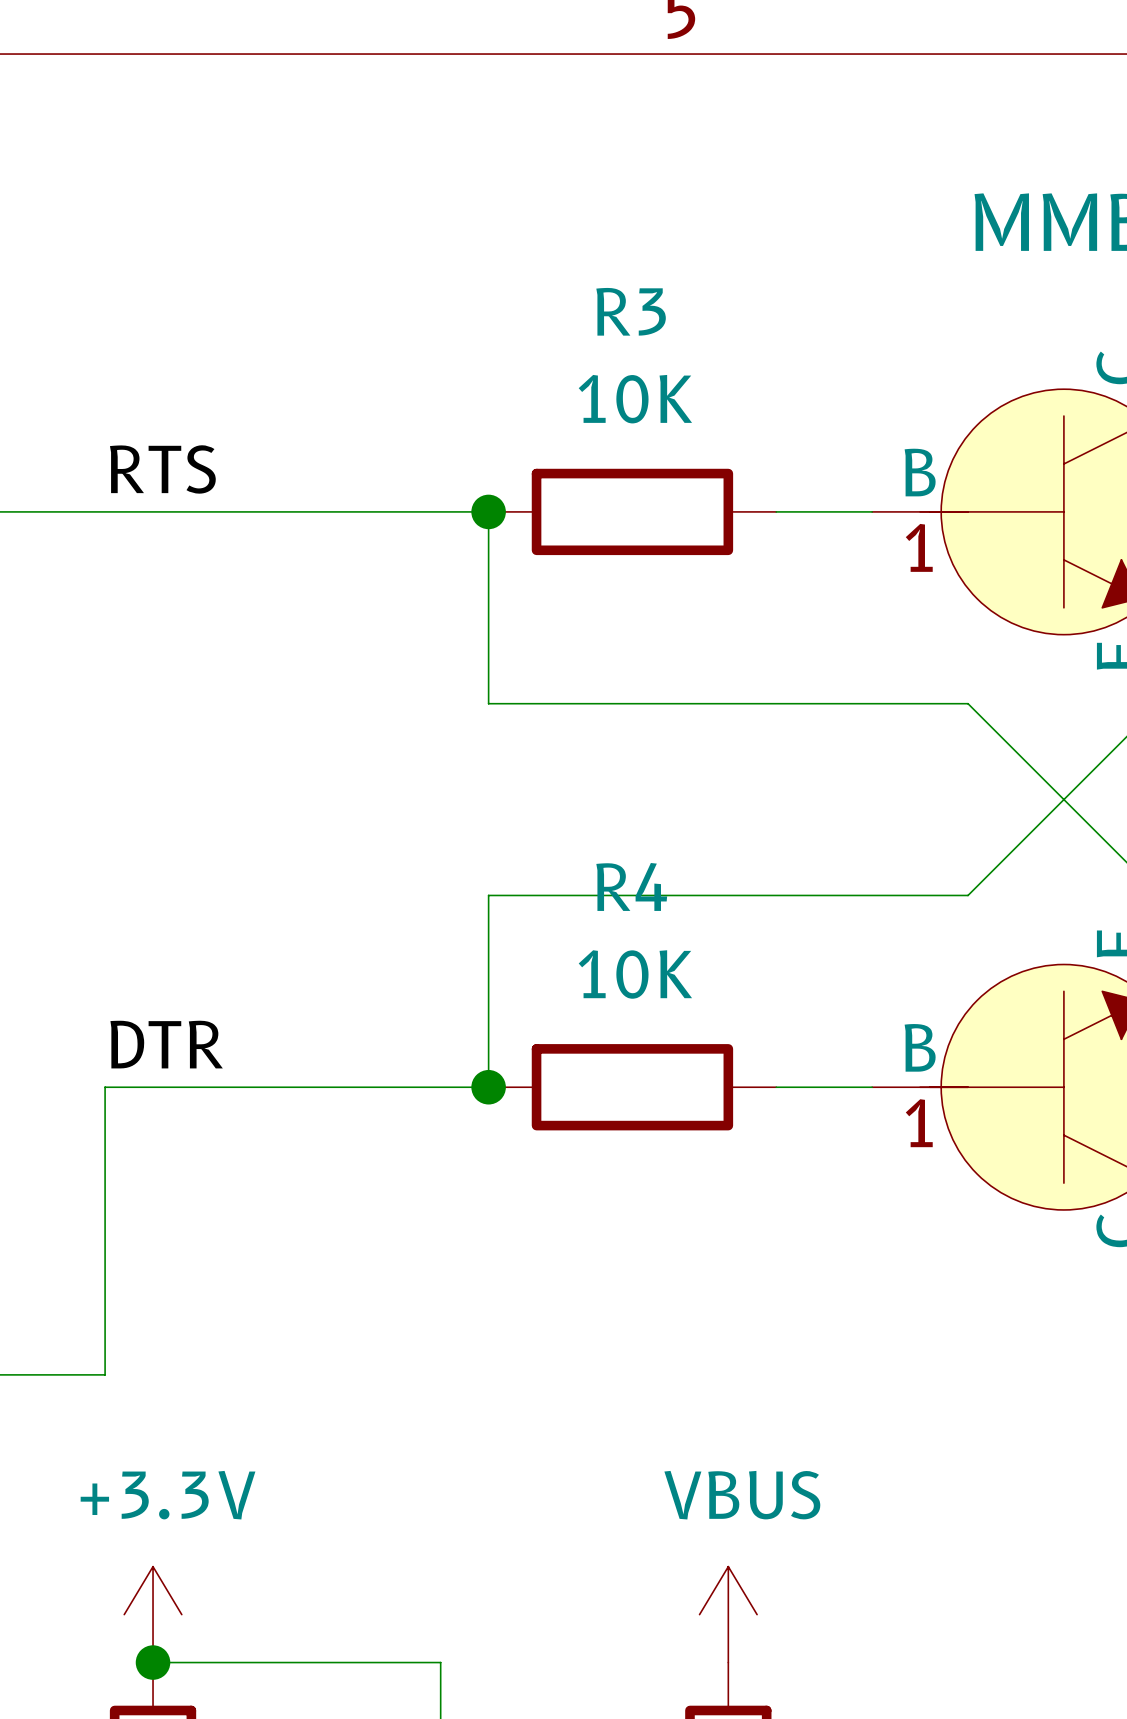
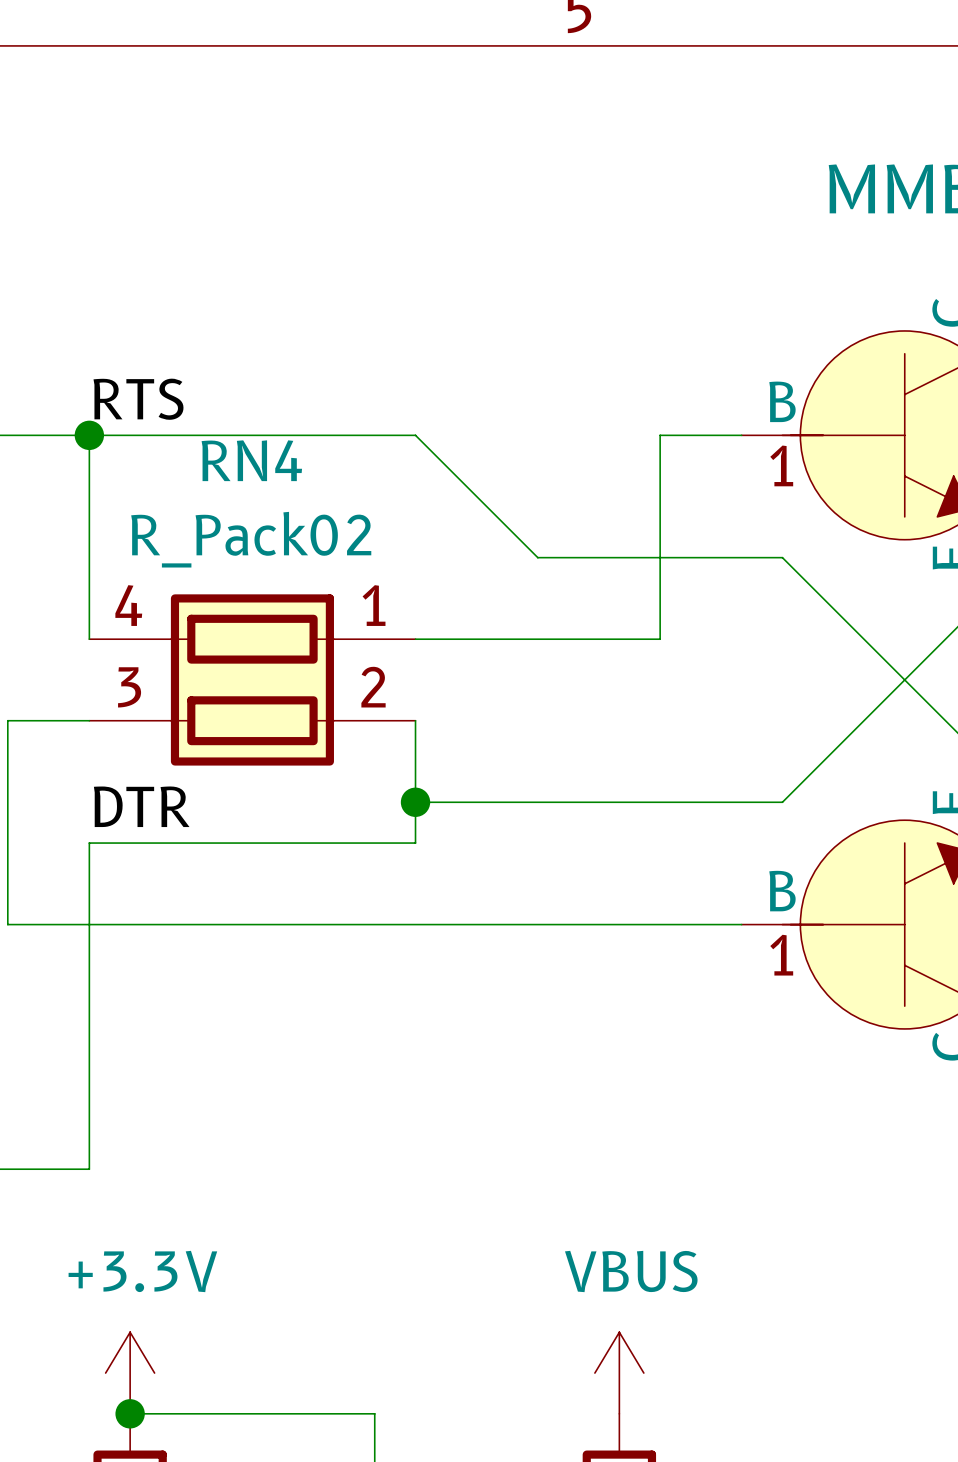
wire: none -> (89, 435) (89, 639)
junction: none -> (89, 435)
wire: (488, 511) (488, 703) (968, 703) -> (415, 435) (537, 557) (782, 557) (823, 598)
junction: (488, 511) -> none
R3: 10K (632, 511) -> none
wire: none -> (660, 435) (660, 639) (415, 639)
RN4: none -> R_Pack02 (252, 679)
wire: none -> (89, 720) (7, 720) (7, 924) (89, 924) (89, 843) (415, 843)
wire: none -> (415, 720) (415, 761)
wire: (488, 895) (968, 895) -> (415, 802) (782, 802) (823, 761)
wire: (488, 991) (488, 1087) -> (660, 924) (415, 924)
label position: DTR (166, 1044) -> DTR (141, 806)
junction position: (488, 1087) -> (415, 802)
R4: 10K (632, 1087) -> none

